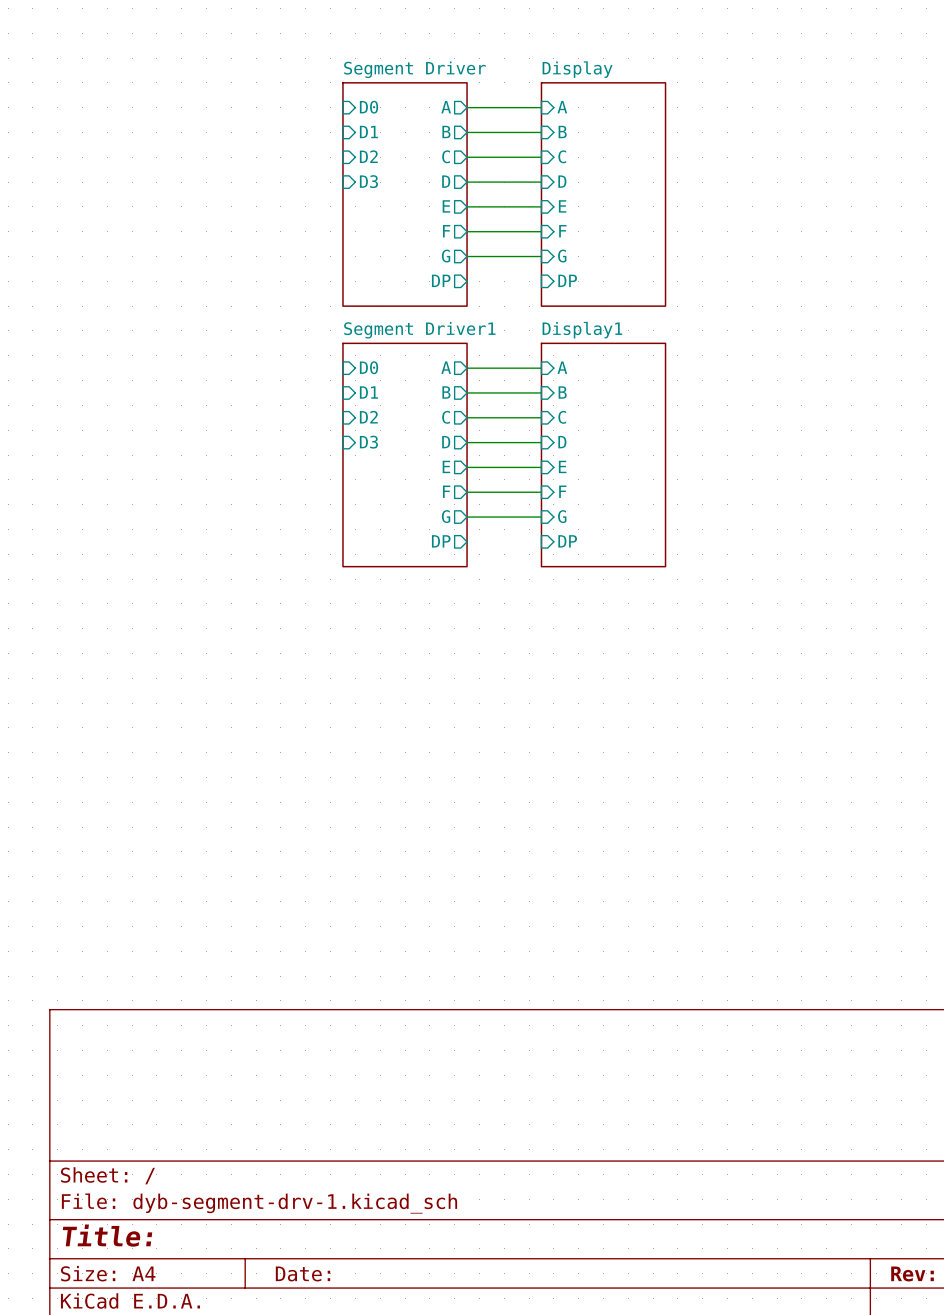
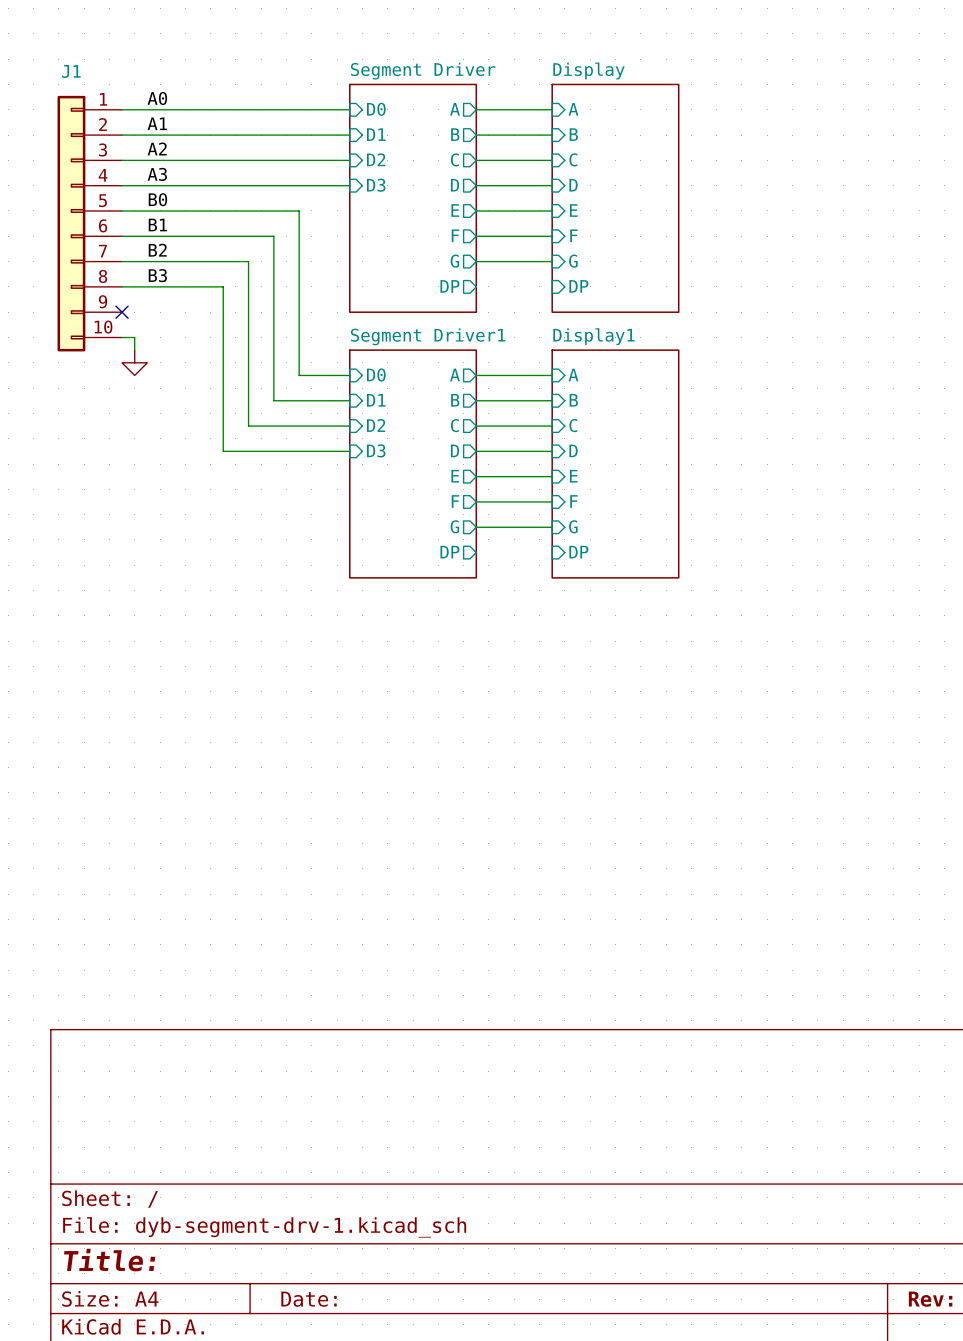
label: none -> A0 (157, 98)
wire: none -> (122, 109) (349, 109)
label: none -> A1 (157, 123)
wire: none -> (122, 135) (349, 135)
label: none -> A2 (157, 148)
wire: none -> (122, 160) (349, 160)
label: none -> A3 (157, 174)
wire: none -> (122, 185) (349, 185)
label: none -> B0 (157, 199)
wire: none -> (122, 210) (299, 210) (299, 375) (349, 375)
J1: none -> (89, 223)
label: none -> B1 (157, 225)
wire: none -> (122, 236) (273, 236) (273, 400) (349, 400)
label: none -> B2 (157, 250)
wire: none -> (122, 261) (248, 261) (248, 426) (349, 426)
label: none -> B3 (157, 275)
wire: none -> (122, 286) (223, 286) (223, 451) (349, 451)
no-connect mark: none -> (122, 312)
wire: none -> (122, 337) (134, 337) (134, 350)
power symbol: none -> (134, 362)

